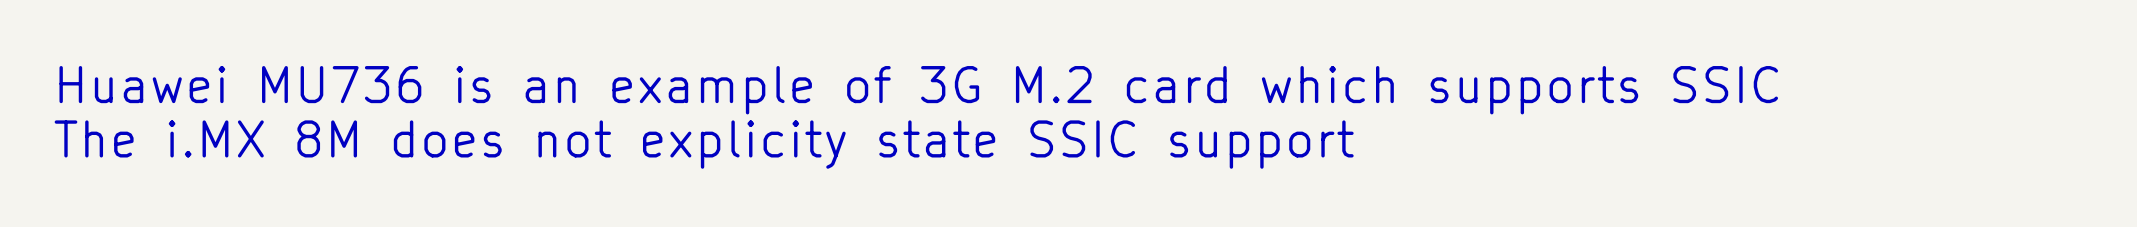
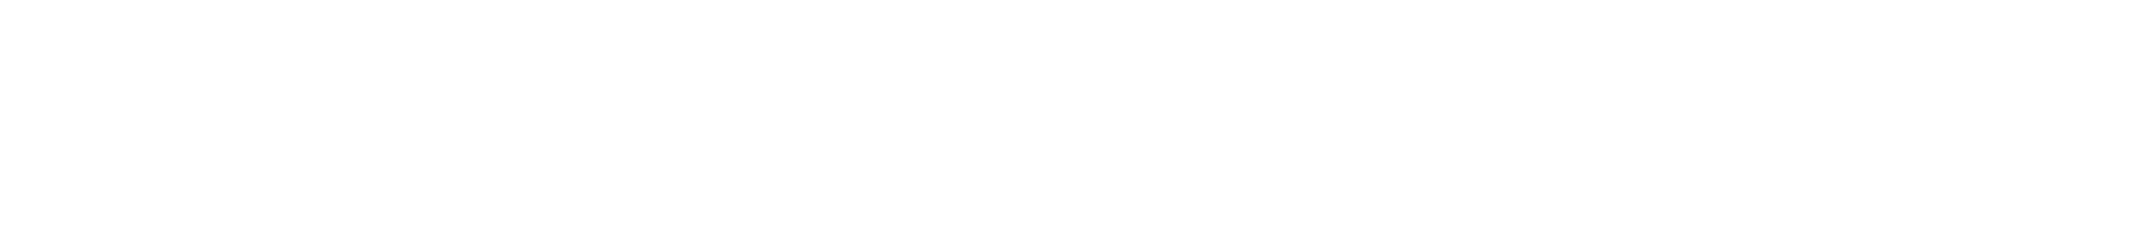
text: Huawei MU736 is an example of 3G M.2 card which supports SSIC (918, 90) -> none
text: The i.MX 8M does not explicity state SSIC support (704, 144) -> none

